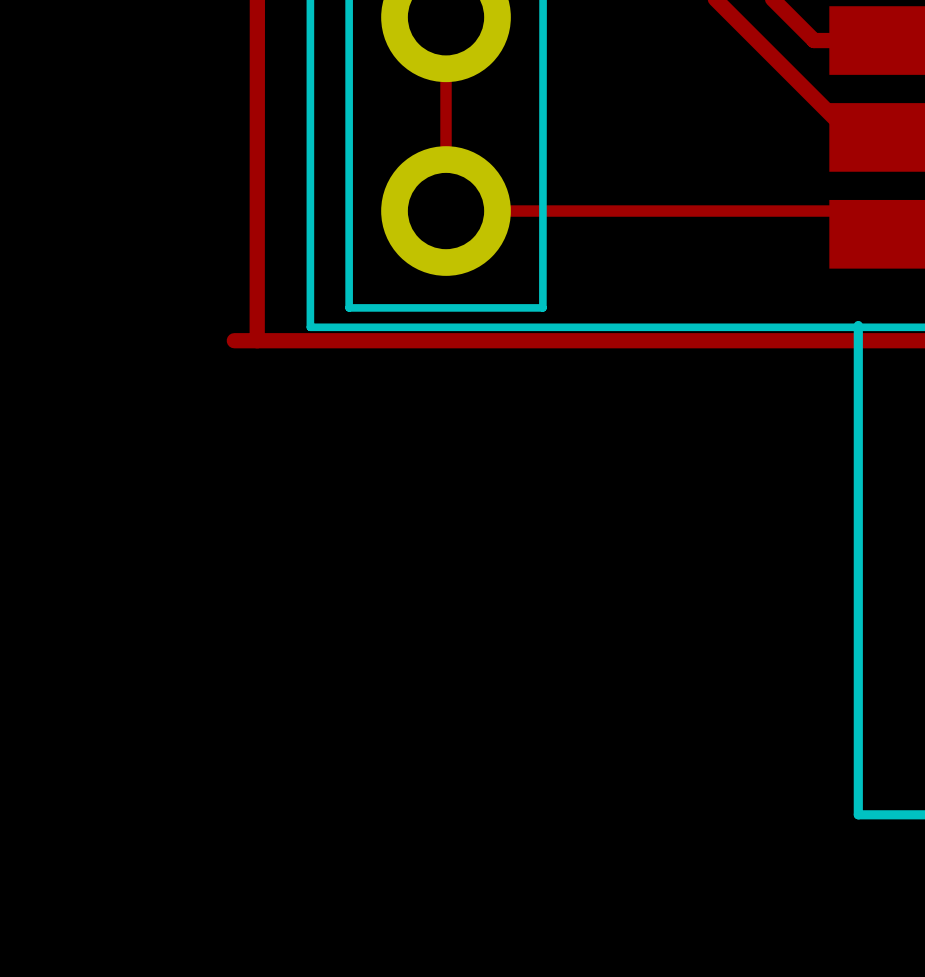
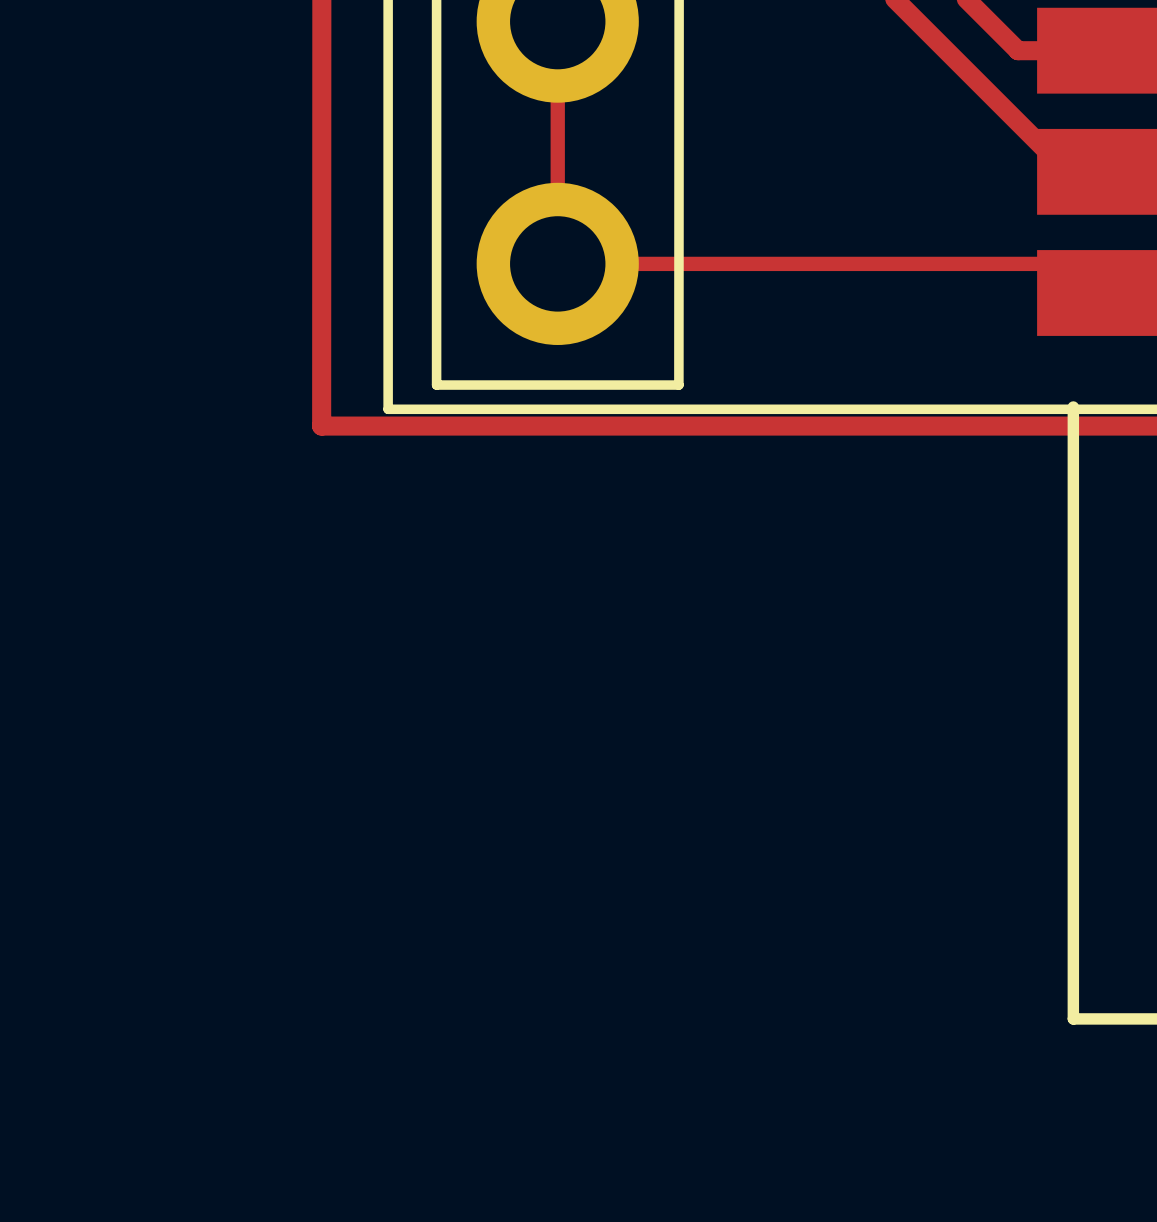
top track: (234, 340) (257, 340) -> none

